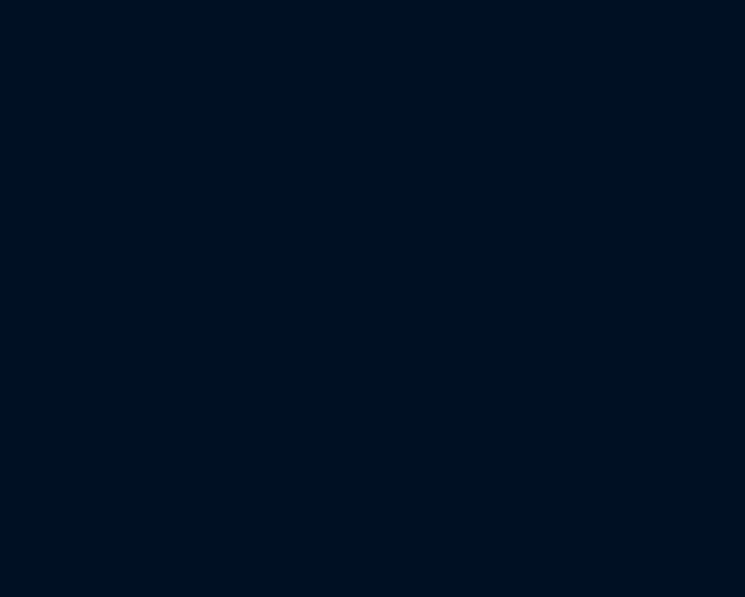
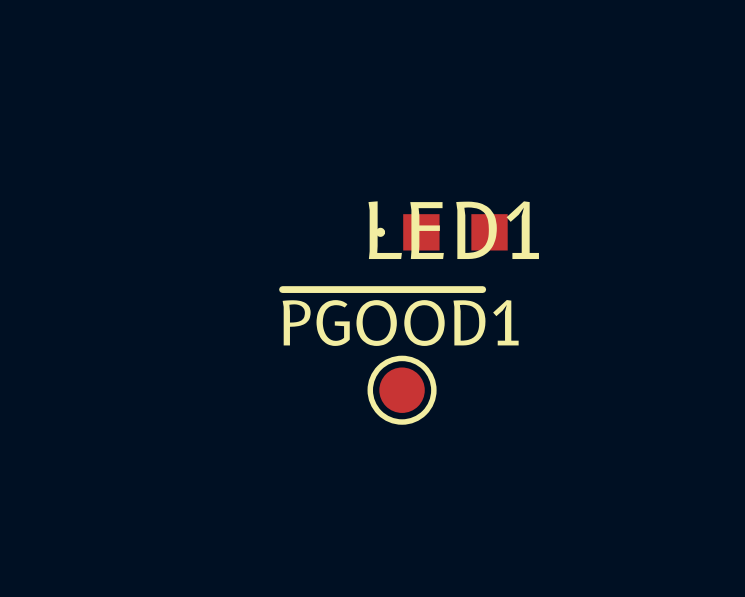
LED1: none -> (441, 232)
~{PGOOD}1: none -> (402, 390)

